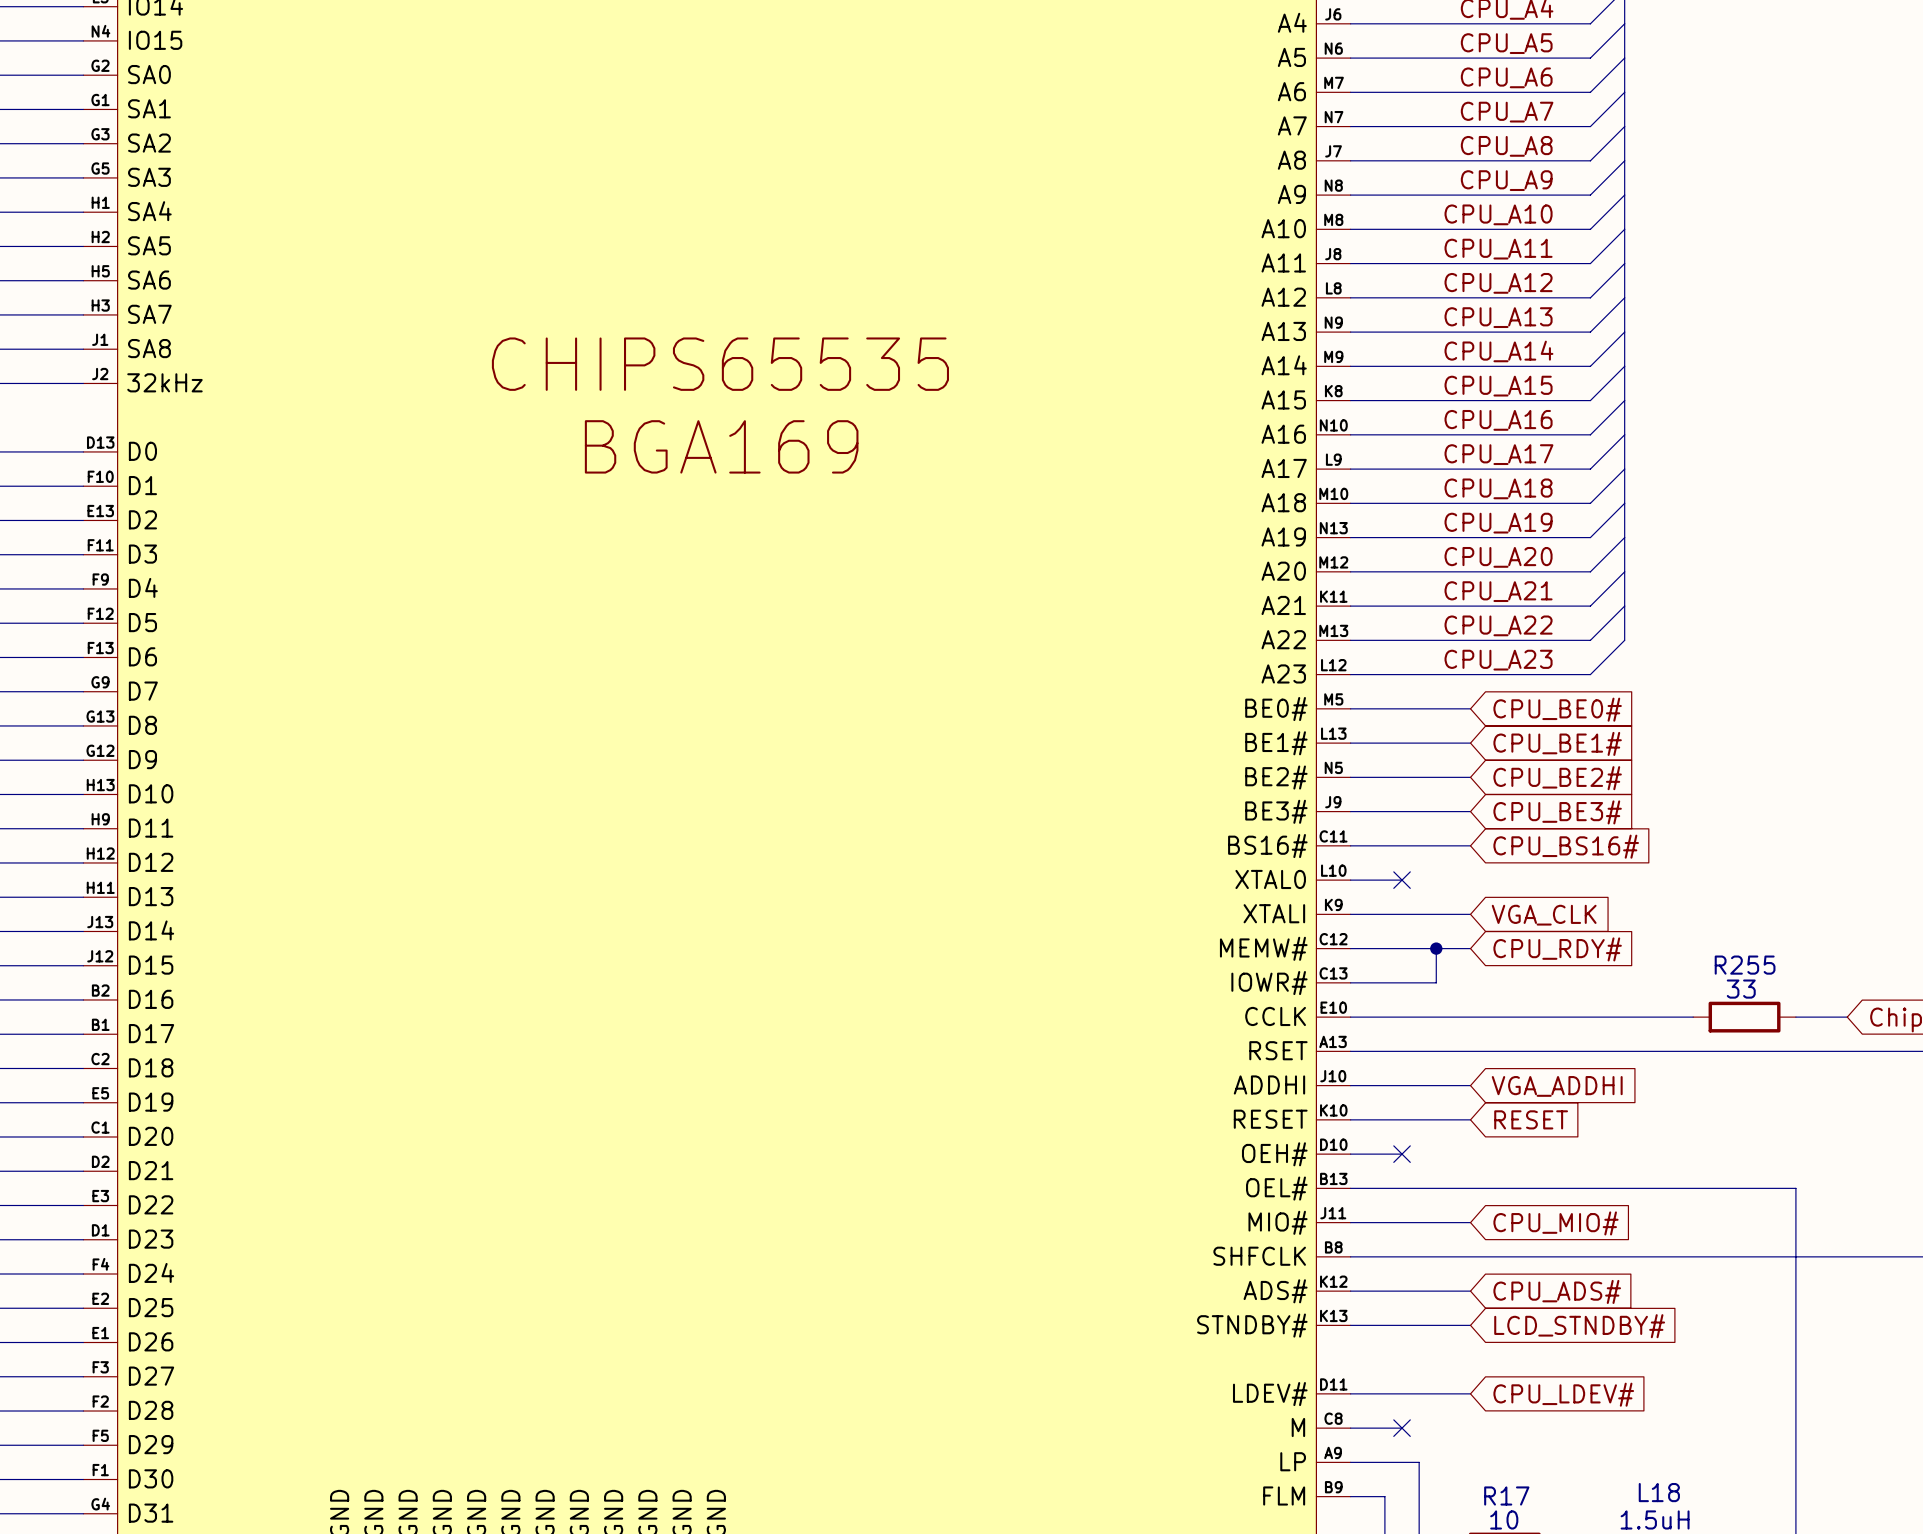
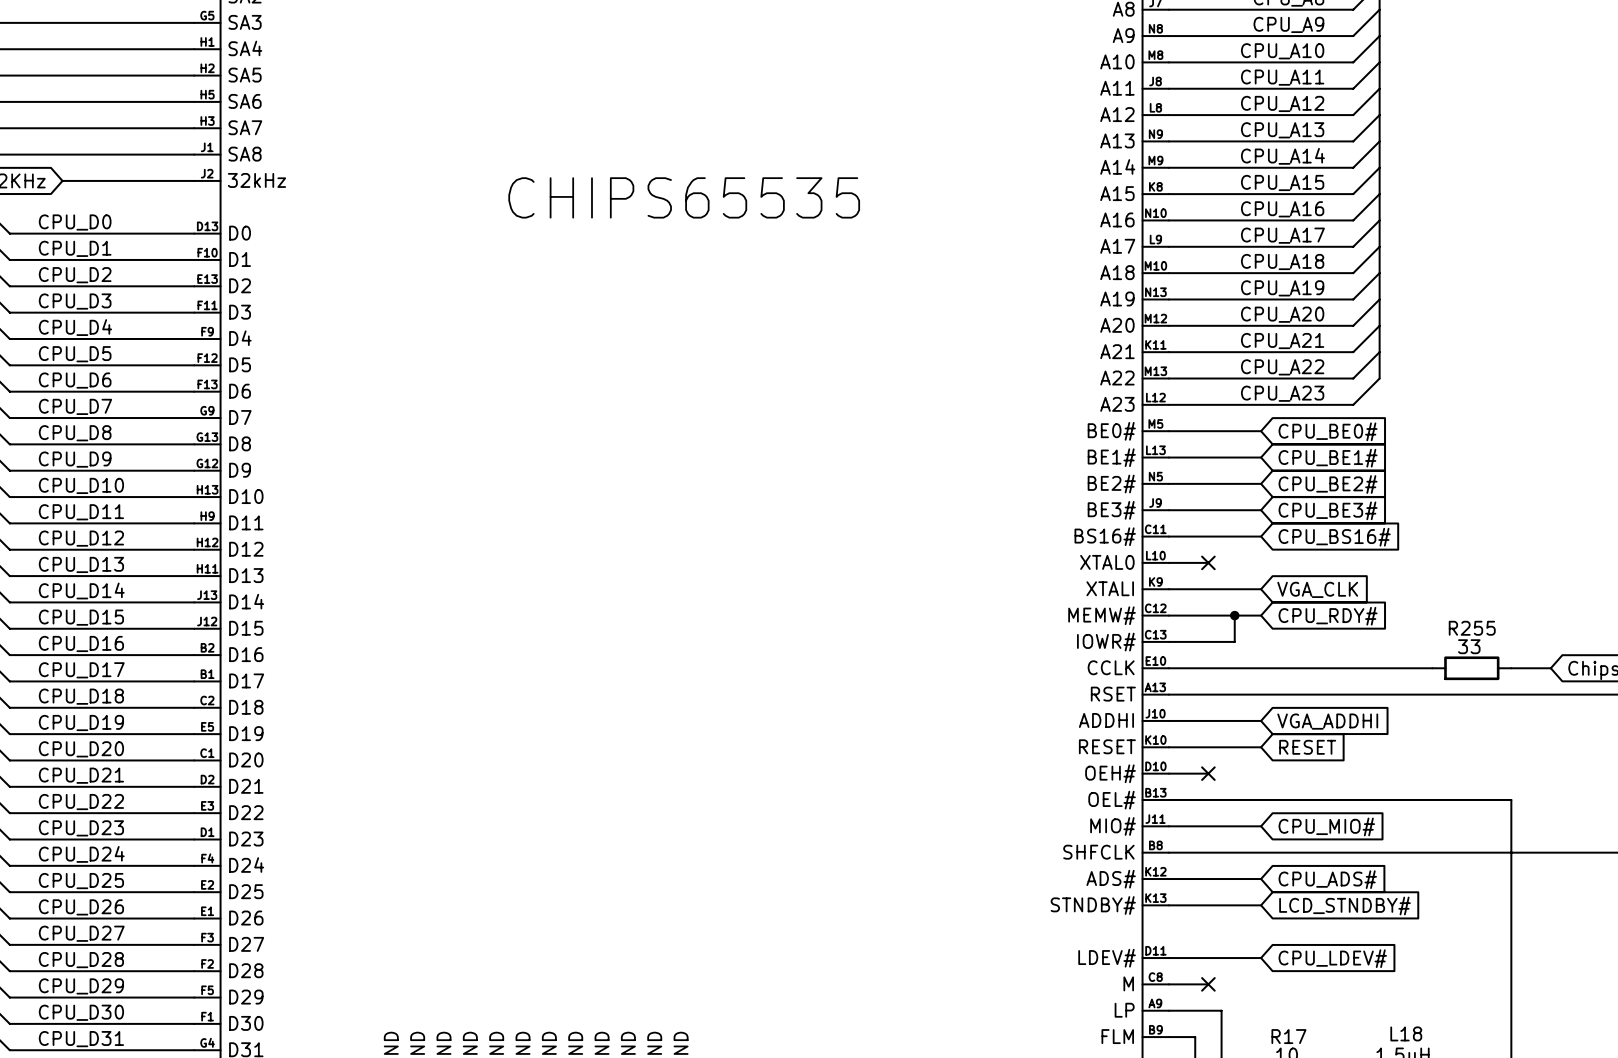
part text position: CHIPS65535 (720, 364) -> CHIPS65535 (684, 197)
part text: BGA169 (721, 446) -> none

